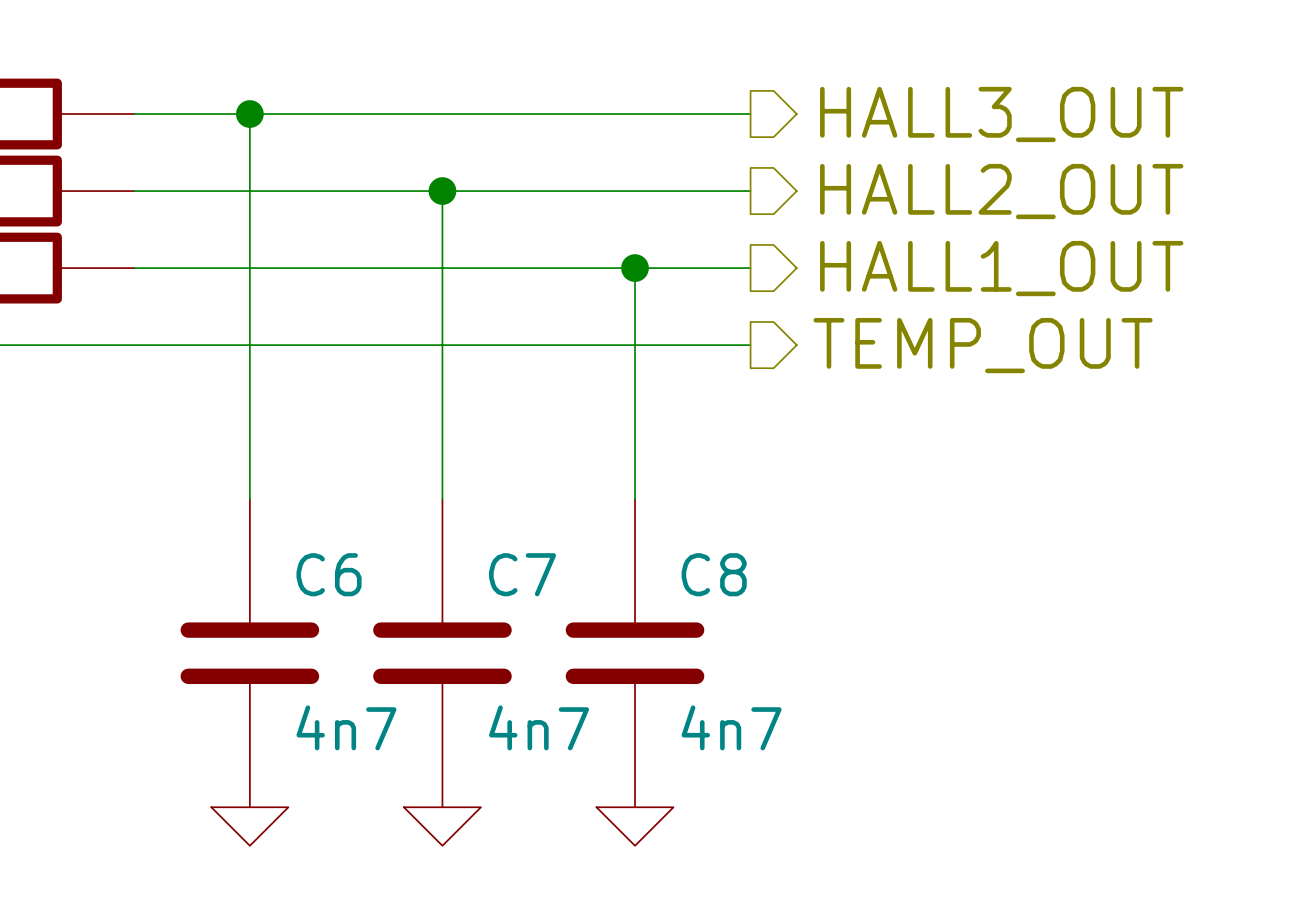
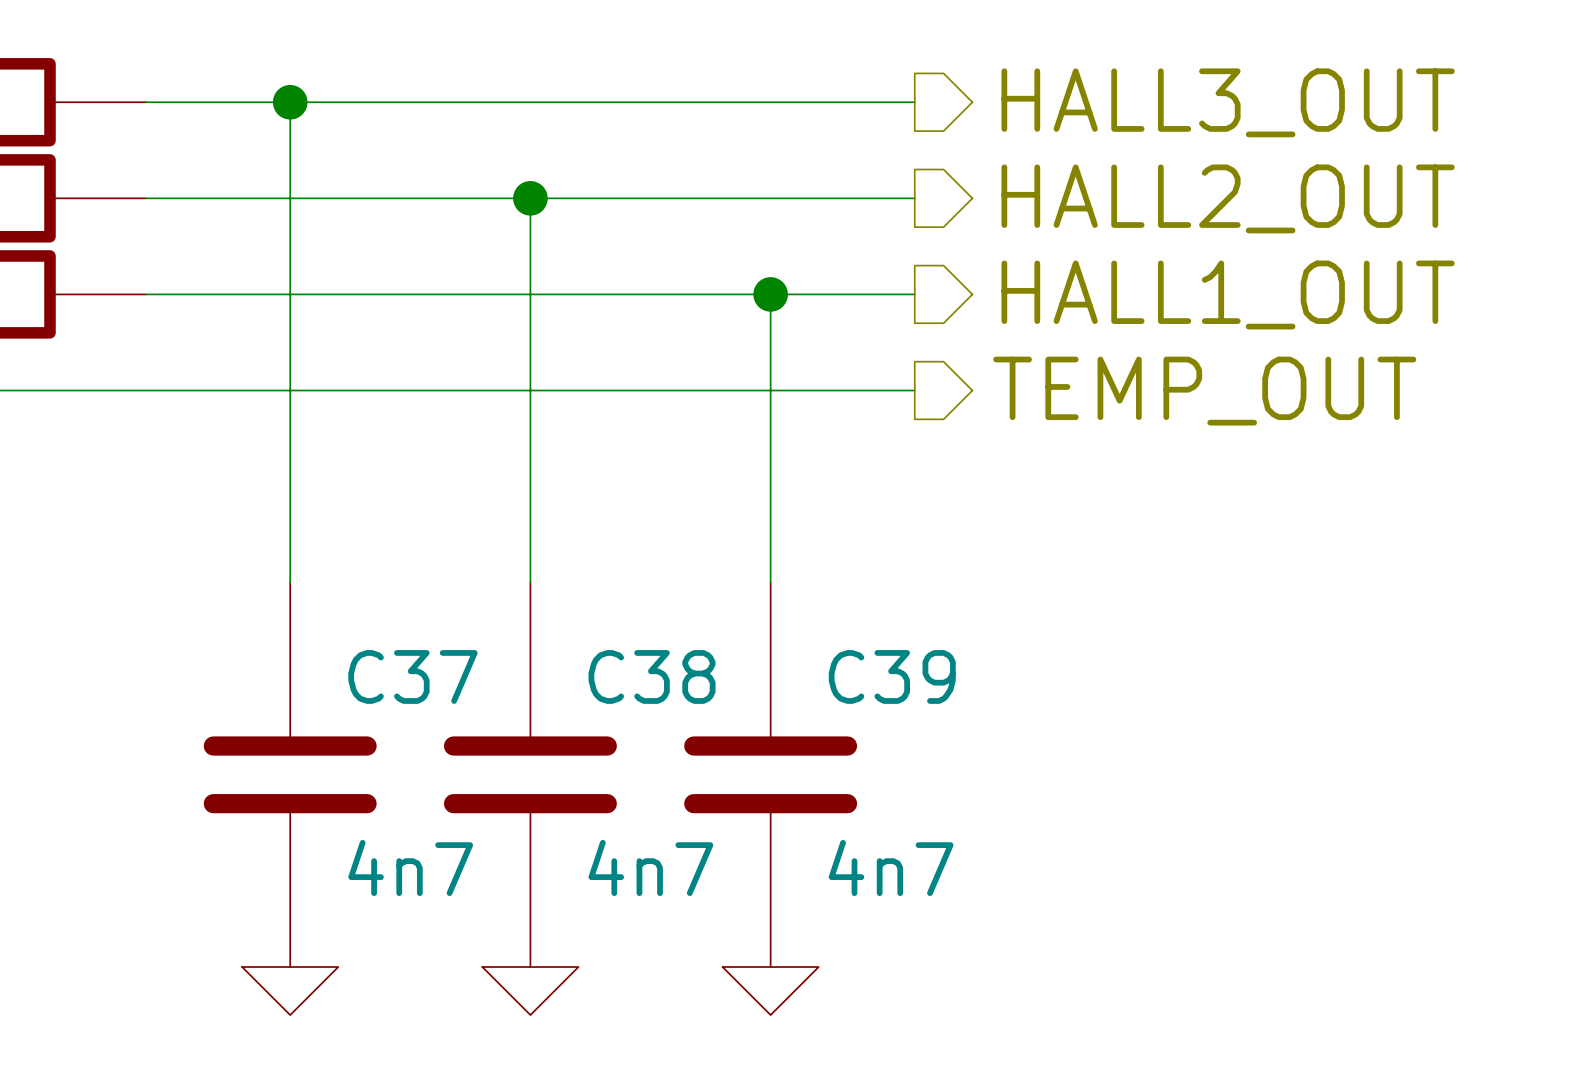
C6 name: C6 (329, 574) -> C37 (412, 676)
C7 name: C7 (522, 574) -> C38 (652, 676)
C8 name: C8 (714, 574) -> C39 (892, 676)

